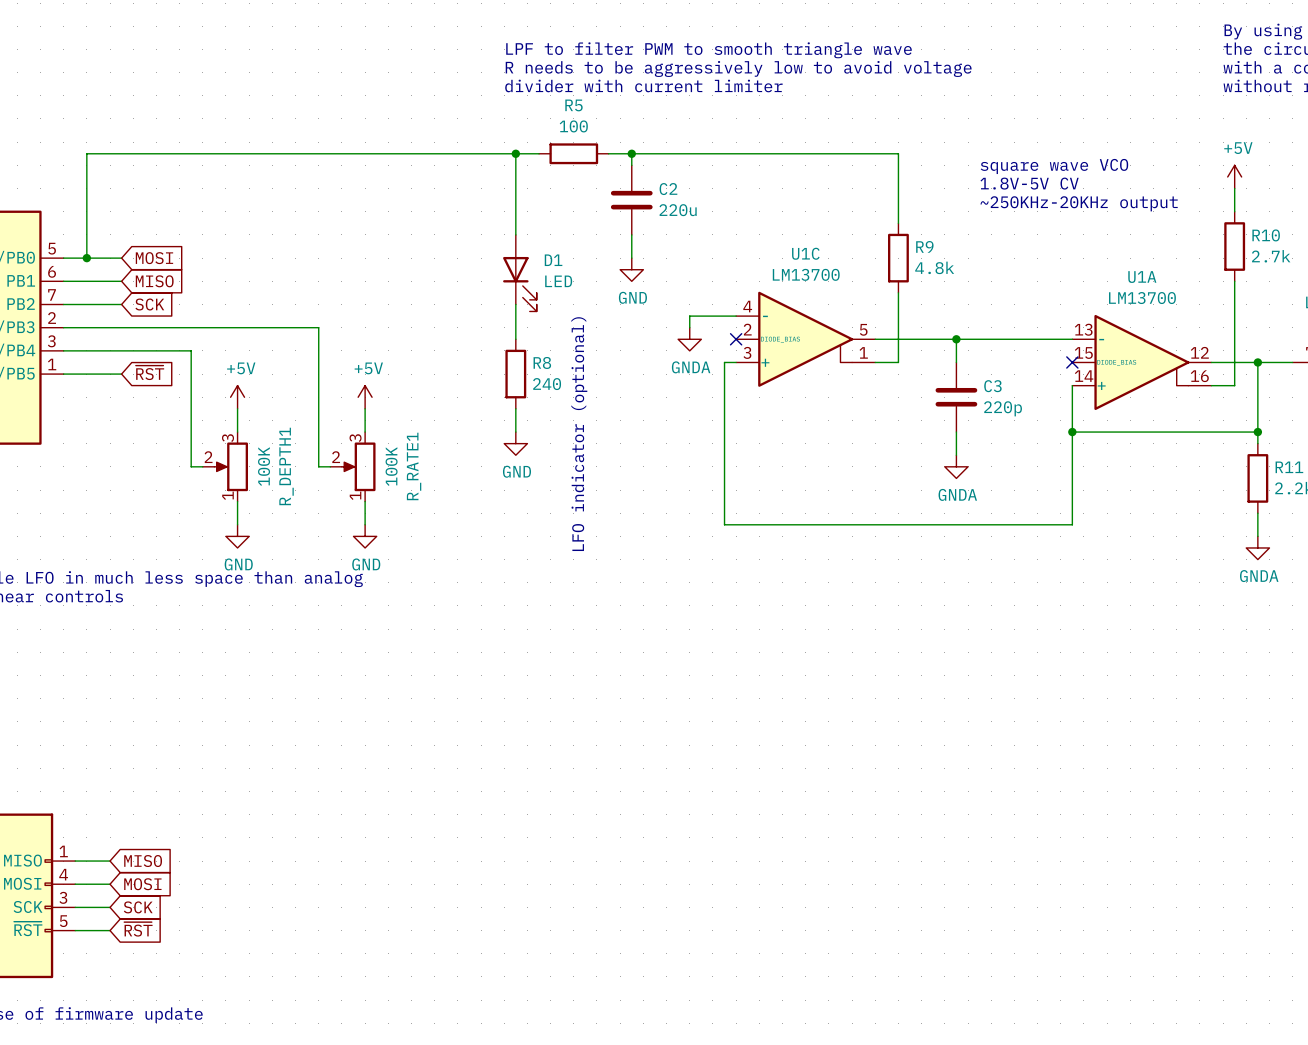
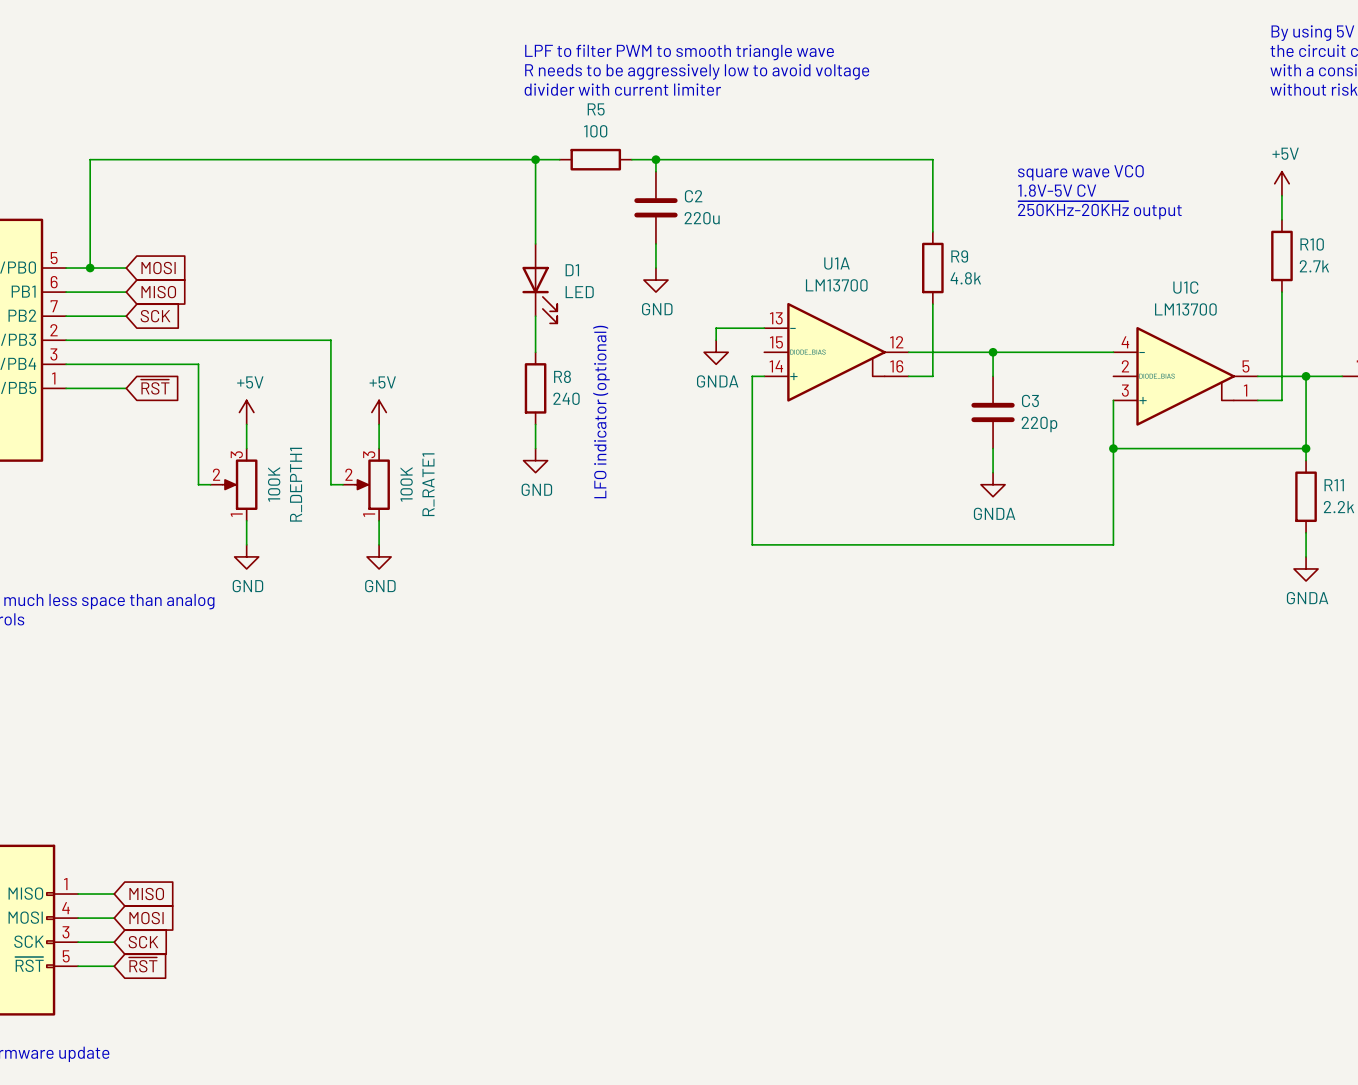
text: ~250KHz-20KHz output (1079, 203) -> ~{250KHz-20KHz} output (1099, 210)
no-connect mark: (736, 339) -> none
U1C position: (805, 339) -> (1185, 376)
no-connect mark: (1072, 362) -> none
U1A position: (1141, 362) -> (836, 352)

